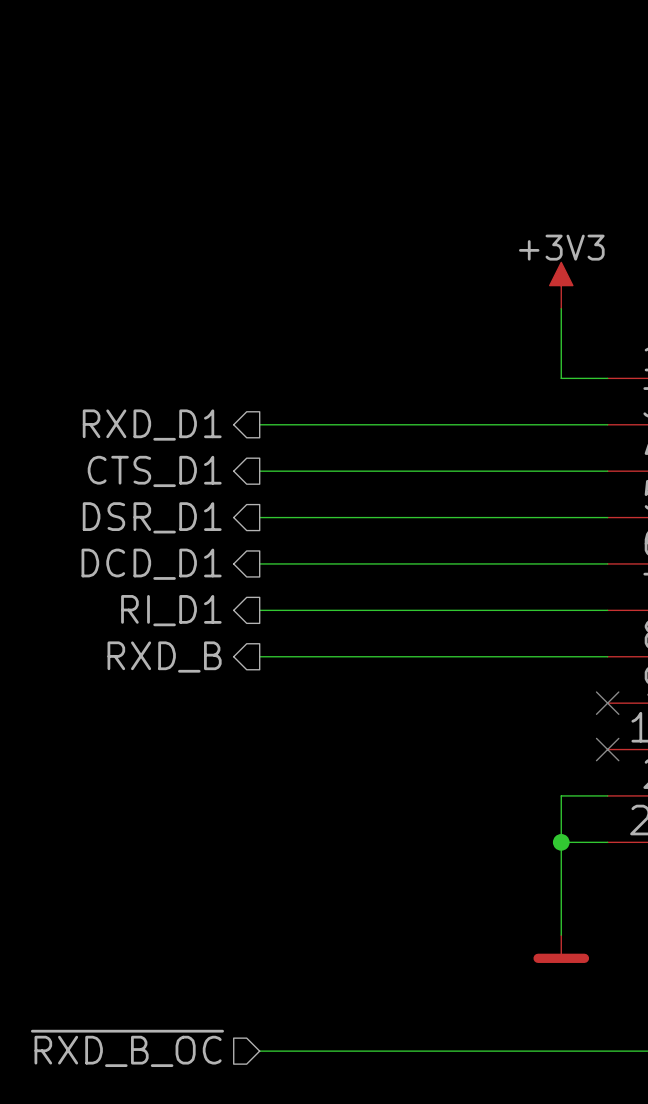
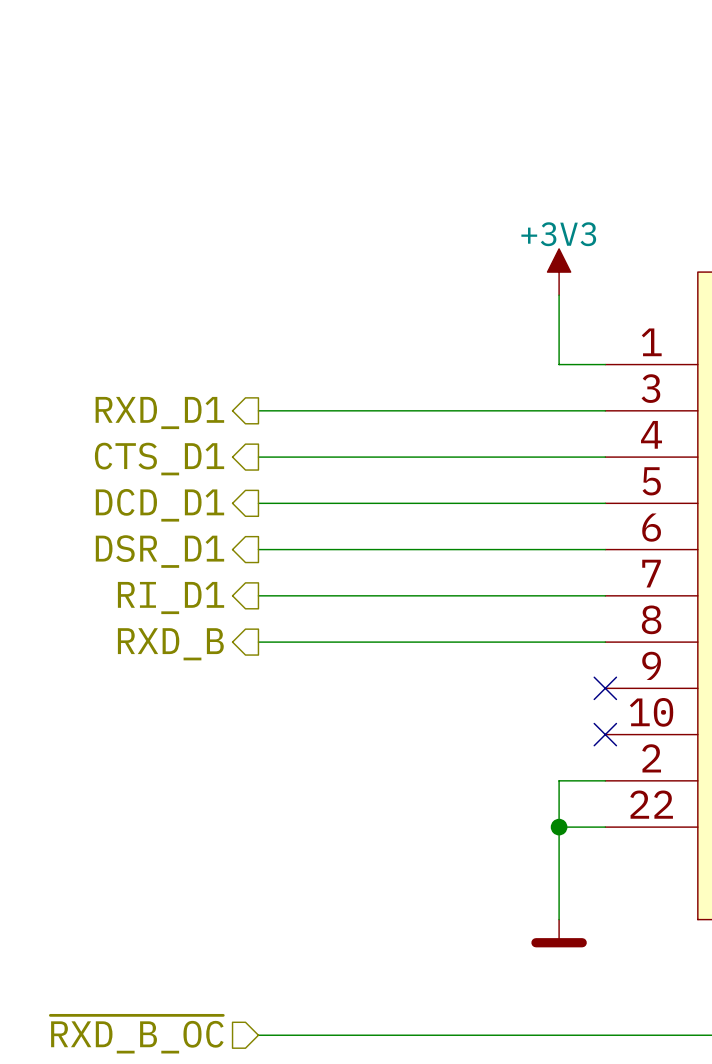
hierarchical label: DSR_D1 (152, 517) -> DCD_D1 (159, 505)
hierarchical label: DCD_D1 (151, 564) -> DSR_D1 (159, 551)

